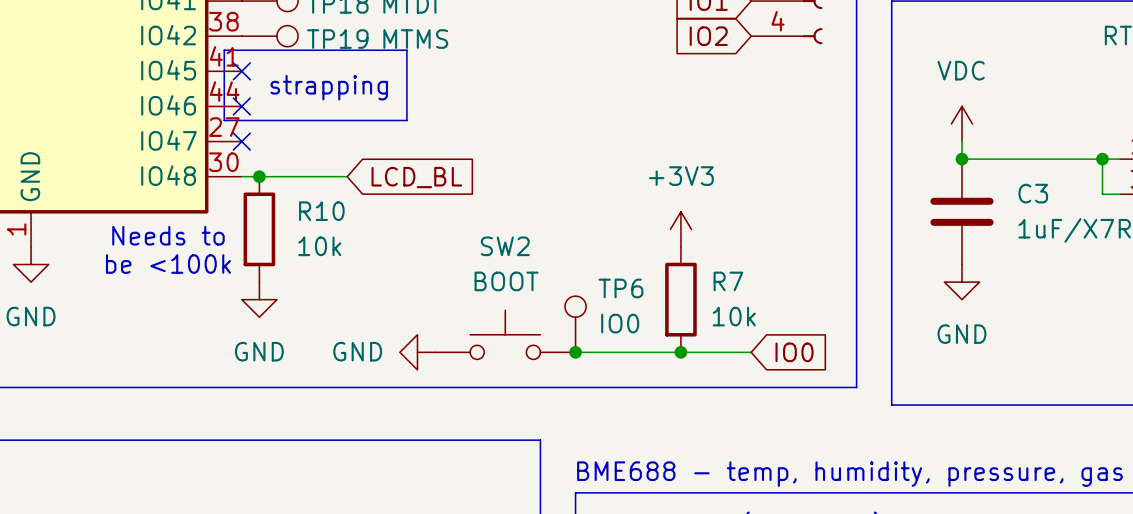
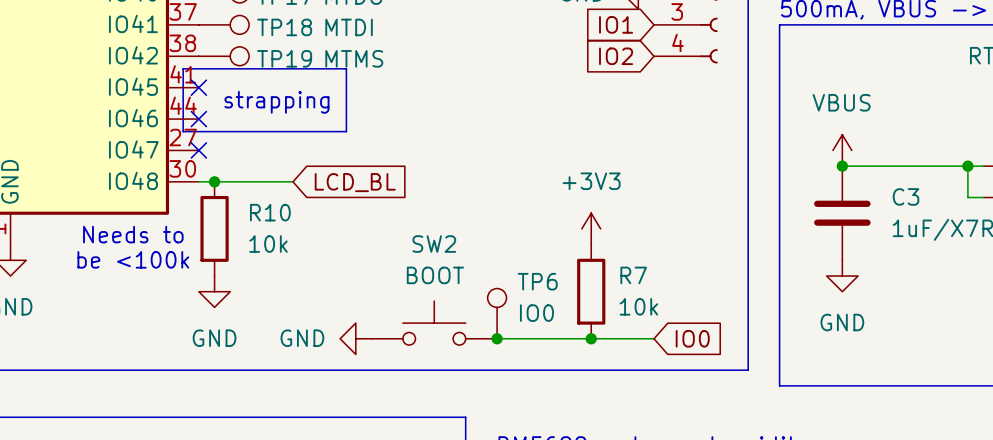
power symbol: VDC (961, 124) -> none
power symbol: none -> VBUS (842, 150)

